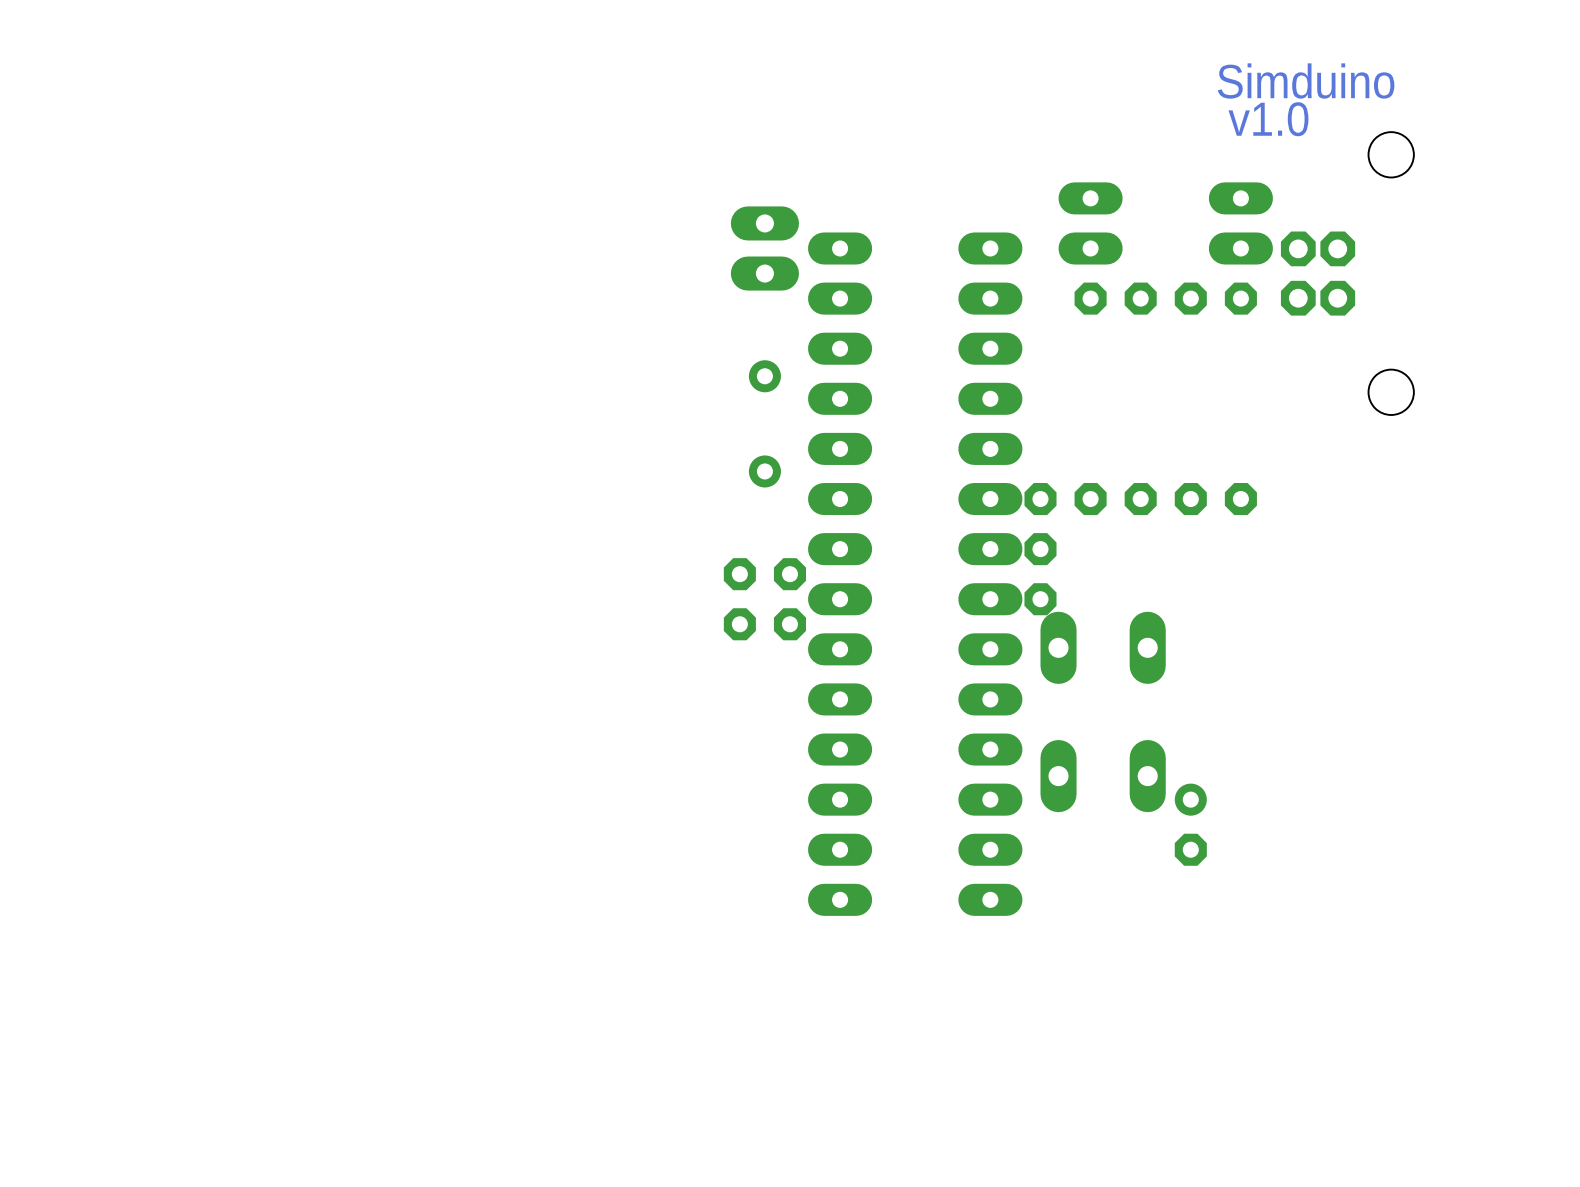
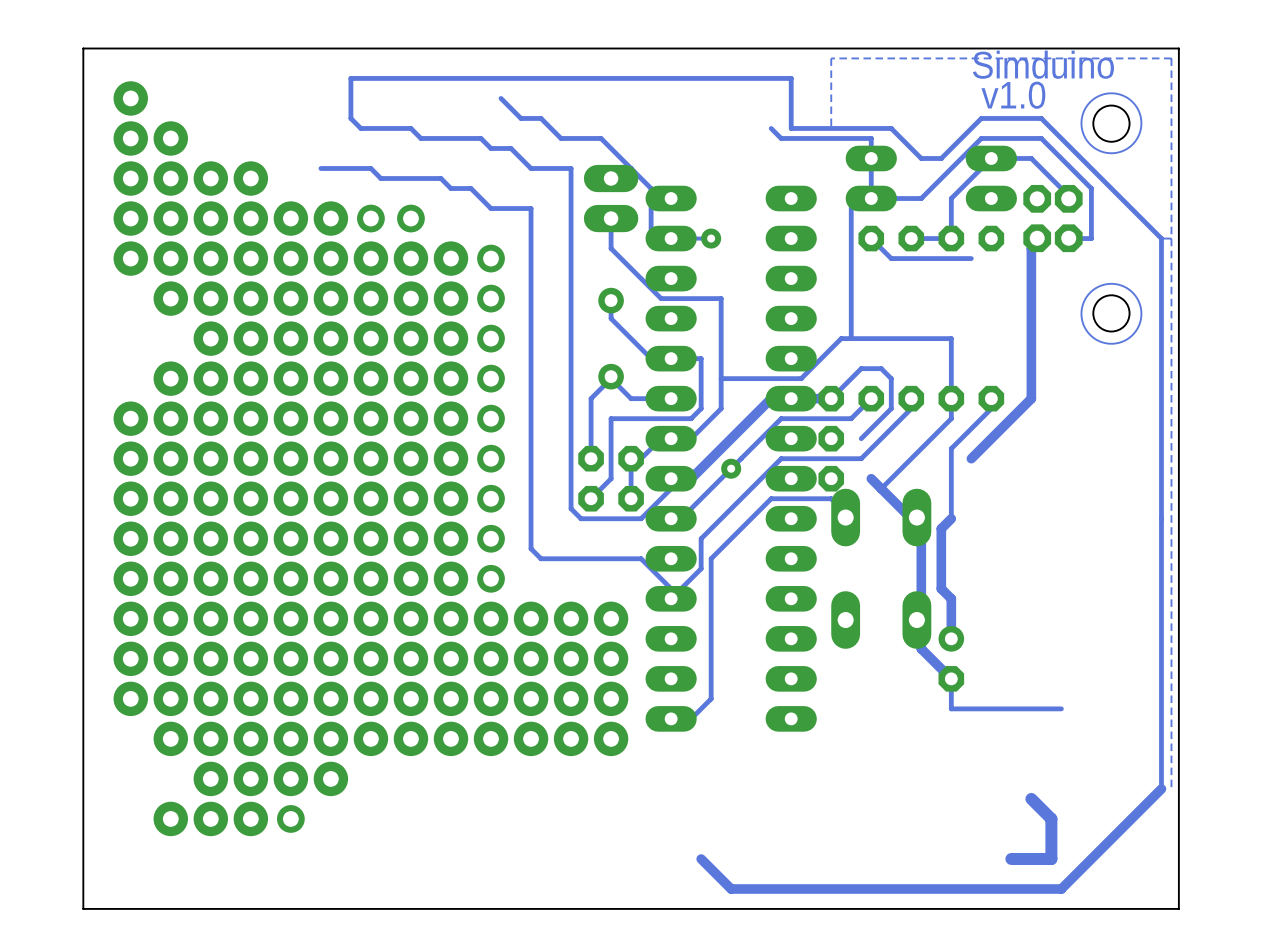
board edge: none -> (1178, 48) (83, 48) (83, 908) (1178, 908) (1178, 48)
zone outline: none -> (1111, 93) (1099, 95) (1090, 102) (1083, 111) (1081, 123) (1083, 134) (1090, 144) (1099, 151) (1111, 153) (1122, 151) (1132, 144) (1139, 134) (1141, 123) (1139, 111) (1132, 102) (1122, 95) (1111, 93)
via: none -> (130, 98)
track: none -> (501, 98) (521, 118) (541, 118) (561, 138) (601, 138) (651, 188) (651, 238) (711, 238)
track: none -> (771, 128) (781, 138) (871, 138) (871, 198)
via: none -> (130, 138)
via: none -> (170, 138)
track: none -> (320, 168) (370, 168) (380, 178) (440, 178) (450, 188) (470, 188) (491, 208) (531, 208) (531, 548) (541, 558) (641, 558) (671, 588) (671, 598) (701, 568) (701, 538) (781, 458) (861, 458) (911, 408) (911, 398)
via: none -> (130, 178)
via: none -> (170, 178)
via: none -> (210, 178)
via: none -> (250, 178)
track: none -> (1068, 198) (1068, 195) (1031, 158) (991, 158) (951, 198) (951, 238) (911, 238)
via: none -> (130, 218)
via: none -> (170, 218)
via: none -> (210, 218)
via: none -> (250, 218)
via: none -> (290, 218)
via: none -> (330, 218)
via: none -> (370, 218)
via: none -> (410, 218)
track: none -> (611, 218) (611, 248) (661, 298) (721, 298) (721, 408) (691, 438) (661, 438) (641, 458) (631, 458) (631, 498)
via: none -> (711, 238)
track: none -> (871, 238) (891, 258) (971, 258)
track: none -> (1037, 238) (1031, 248) (1031, 398) (971, 458)
track: none -> (1068, 238) (1091, 238) (1091, 188) (1041, 138) (981, 138) (921, 198) (851, 198) (851, 338)
zone outline: none -> (1161, 238) (1041, 118) (981, 118) (941, 158) (921, 158) (891, 128) (831, 128) (831, 58) (1171, 58) (1171, 788)
zone outline: none -> (1171, 238) (1161, 238)
via: none -> (130, 258)
via: none -> (170, 258)
via: none -> (210, 258)
via: none -> (250, 258)
via: none -> (290, 258)
via: none -> (330, 258)
via: none -> (370, 258)
via: none -> (410, 258)
via: none -> (450, 258)
via: none -> (491, 258)
zone outline: none -> (1111, 283) (1099, 286) (1090, 292) (1083, 302) (1081, 313) (1083, 325) (1090, 335) (1099, 341) (1111, 343) (1122, 341) (1132, 335) (1139, 325) (1141, 313) (1139, 302) (1132, 292) (1122, 286) (1111, 283)
via: none -> (170, 298)
via: none -> (210, 298)
via: none -> (250, 298)
via: none -> (290, 298)
via: none -> (330, 298)
via: none -> (370, 298)
via: none -> (410, 298)
via: none -> (450, 298)
via: none -> (491, 298)
track: none -> (611, 298) (611, 318) (651, 358) (701, 358) (701, 408) (691, 418) (611, 418) (611, 478) (591, 498)
via: none -> (210, 338)
via: none -> (250, 338)
via: none -> (290, 338)
via: none -> (330, 338)
via: none -> (370, 338)
via: none -> (410, 338)
via: none -> (450, 338)
via: none -> (491, 338)
via: none -> (170, 378)
via: none -> (210, 378)
via: none -> (250, 378)
via: none -> (290, 378)
via: none -> (330, 378)
via: none -> (370, 378)
via: none -> (410, 378)
via: none -> (450, 378)
via: none -> (491, 378)
track: none -> (611, 378) (631, 398) (671, 398)
track: none -> (611, 378) (591, 398) (591, 458)
track: none -> (721, 378) (801, 378) (841, 338) (951, 338) (951, 418) (881, 488)
track: none -> (871, 398) (851, 418) (781, 418) (681, 518)
track: none -> (991, 408) (951, 448) (951, 518) (941, 528) (941, 588) (951, 598) (951, 638)
via: none -> (130, 418)
via: none -> (170, 418)
via: none -> (210, 418)
via: none -> (250, 418)
via: none -> (290, 418)
via: none -> (330, 418)
via: none -> (370, 418)
via: none -> (410, 418)
via: none -> (450, 418)
via: none -> (491, 418)
track: none -> (861, 438) (891, 408) (891, 378) (881, 368) (861, 368) (831, 398) (771, 398) (691, 478) (671, 478) (671, 488) (641, 518) (581, 518) (571, 508) (571, 168) (531, 168) (511, 148) (491, 148) (481, 138) (420, 138) (410, 128) (360, 128) (350, 118) (350, 78) (791, 78) (791, 128) (891, 128) (921, 158) (941, 158) (981, 118) (1041, 118) (1161, 238) (1161, 788) (1061, 889) (731, 889) (701, 858)
via: none -> (130, 458)
via: none -> (170, 458)
via: none -> (210, 458)
via: none -> (250, 458)
via: none -> (290, 458)
via: none -> (330, 458)
via: none -> (370, 458)
via: none -> (410, 458)
via: none -> (450, 458)
via: none -> (491, 458)
via: none -> (731, 468)
track: none -> (871, 478) (921, 528) (921, 648) (951, 678) (951, 708) (1061, 708)
via: none -> (130, 498)
via: none -> (170, 498)
via: none -> (210, 498)
via: none -> (250, 498)
via: none -> (290, 498)
via: none -> (330, 498)
via: none -> (370, 498)
via: none -> (410, 498)
via: none -> (450, 498)
via: none -> (491, 498)
track: none -> (845, 517) (841, 508) (831, 498) (771, 498) (711, 558) (711, 698) (691, 718) (671, 718)
via: none -> (130, 538)
via: none -> (170, 538)
via: none -> (210, 538)
via: none -> (250, 538)
via: none -> (290, 538)
via: none -> (330, 538)
via: none -> (370, 538)
via: none -> (410, 538)
via: none -> (450, 538)
via: none -> (491, 538)
via: none -> (130, 578)
via: none -> (170, 578)
via: none -> (210, 578)
via: none -> (250, 578)
via: none -> (290, 578)
via: none -> (330, 578)
via: none -> (370, 578)
via: none -> (410, 578)
via: none -> (450, 578)
via: none -> (491, 578)
via: none -> (130, 618)
via: none -> (170, 618)
via: none -> (210, 618)
via: none -> (250, 618)
via: none -> (290, 618)
via: none -> (330, 618)
via: none -> (370, 618)
via: none -> (410, 618)
via: none -> (450, 618)
via: none -> (491, 618)
via: none -> (531, 618)
via: none -> (571, 618)
via: none -> (611, 618)
via: none -> (130, 658)
via: none -> (170, 658)
via: none -> (210, 658)
via: none -> (250, 658)
via: none -> (290, 658)
via: none -> (330, 658)
via: none -> (370, 658)
via: none -> (410, 658)
via: none -> (450, 658)
via: none -> (491, 658)
via: none -> (531, 658)
via: none -> (571, 658)
via: none -> (611, 658)
via: none -> (130, 698)
via: none -> (170, 698)
via: none -> (210, 698)
via: none -> (250, 698)
via: none -> (290, 698)
via: none -> (330, 698)
via: none -> (370, 698)
via: none -> (410, 698)
via: none -> (450, 698)
via: none -> (491, 698)
via: none -> (531, 698)
via: none -> (571, 698)
via: none -> (611, 698)
via: none -> (170, 738)
via: none -> (210, 738)
via: none -> (250, 738)
via: none -> (290, 738)
via: none -> (330, 738)
via: none -> (370, 738)
via: none -> (410, 738)
via: none -> (450, 738)
via: none -> (491, 738)
via: none -> (531, 738)
via: none -> (571, 738)
via: none -> (611, 738)
via: none -> (210, 778)
via: none -> (250, 778)
via: none -> (290, 778)
via: none -> (330, 778)
track: none -> (1031, 798) (1051, 818) (1051, 858) (1011, 858)
via: none -> (170, 818)
via: none -> (210, 818)
via: none -> (250, 818)
via: none -> (290, 818)

